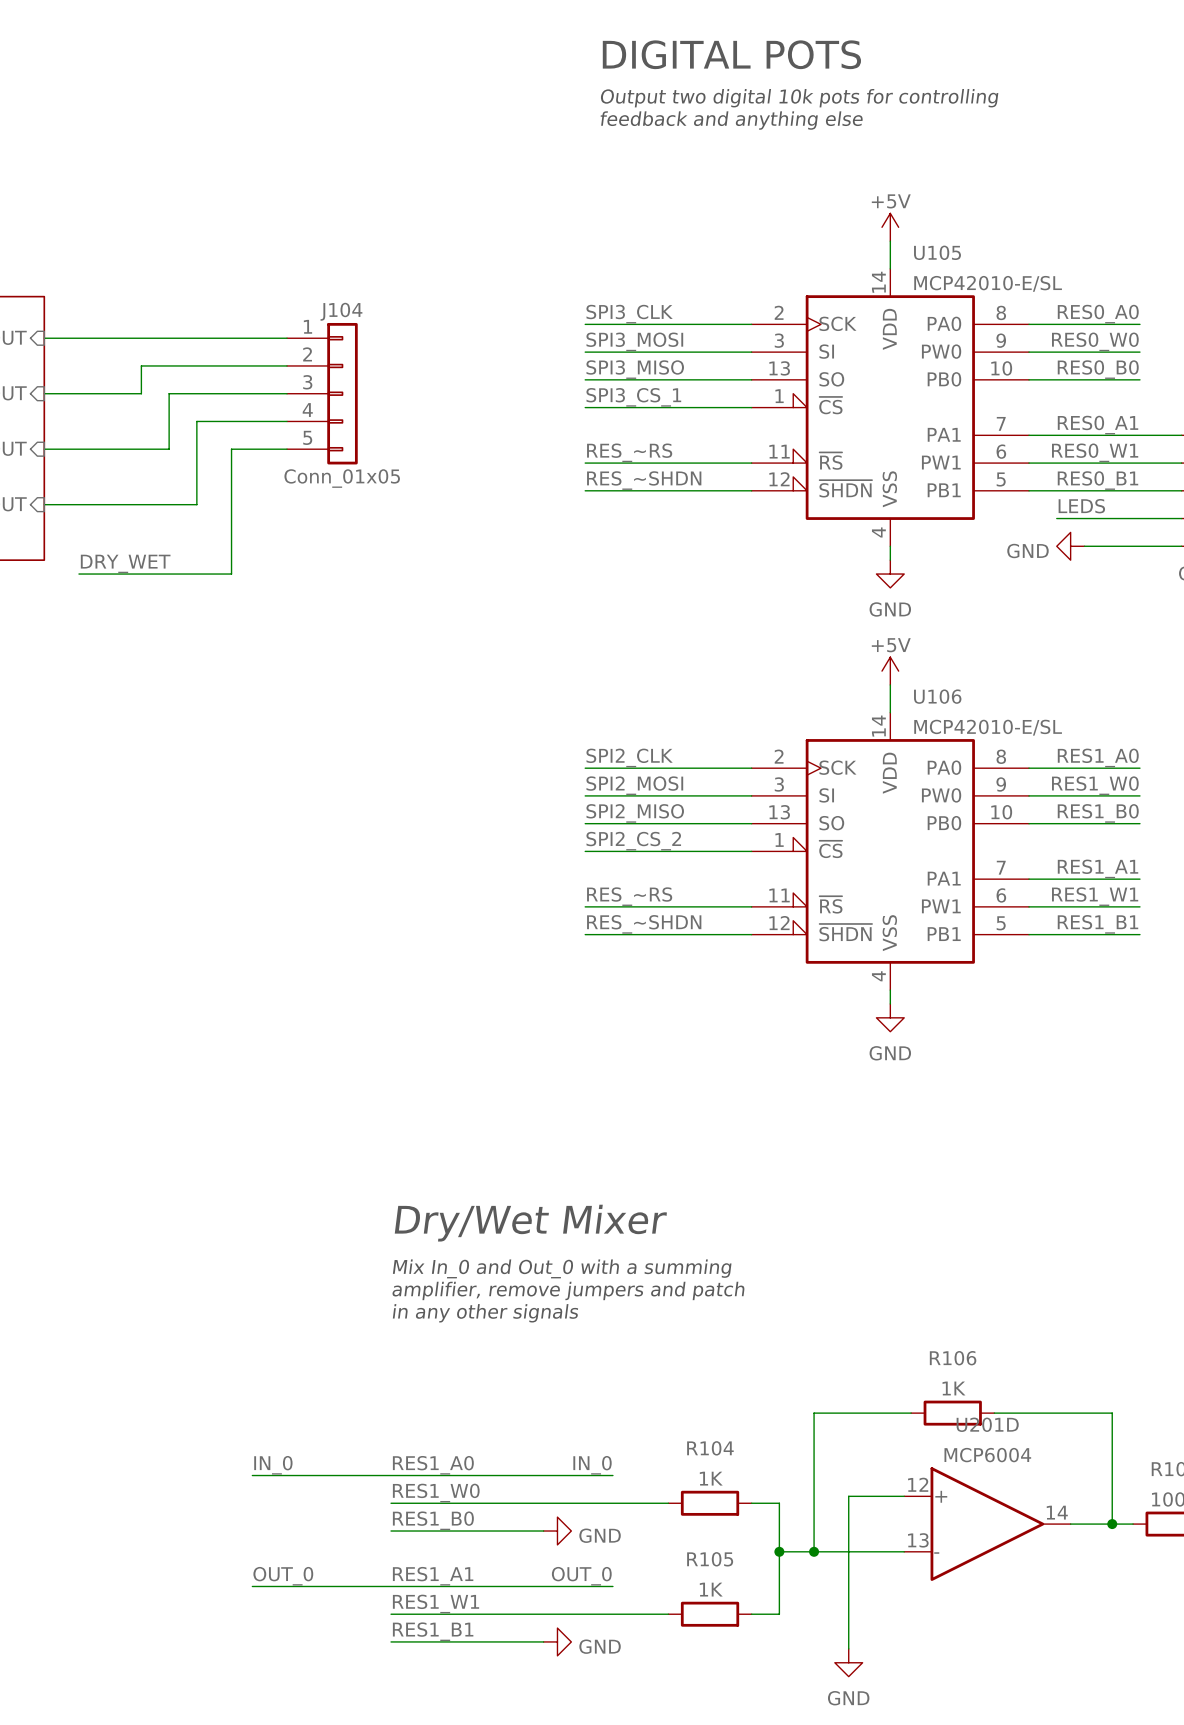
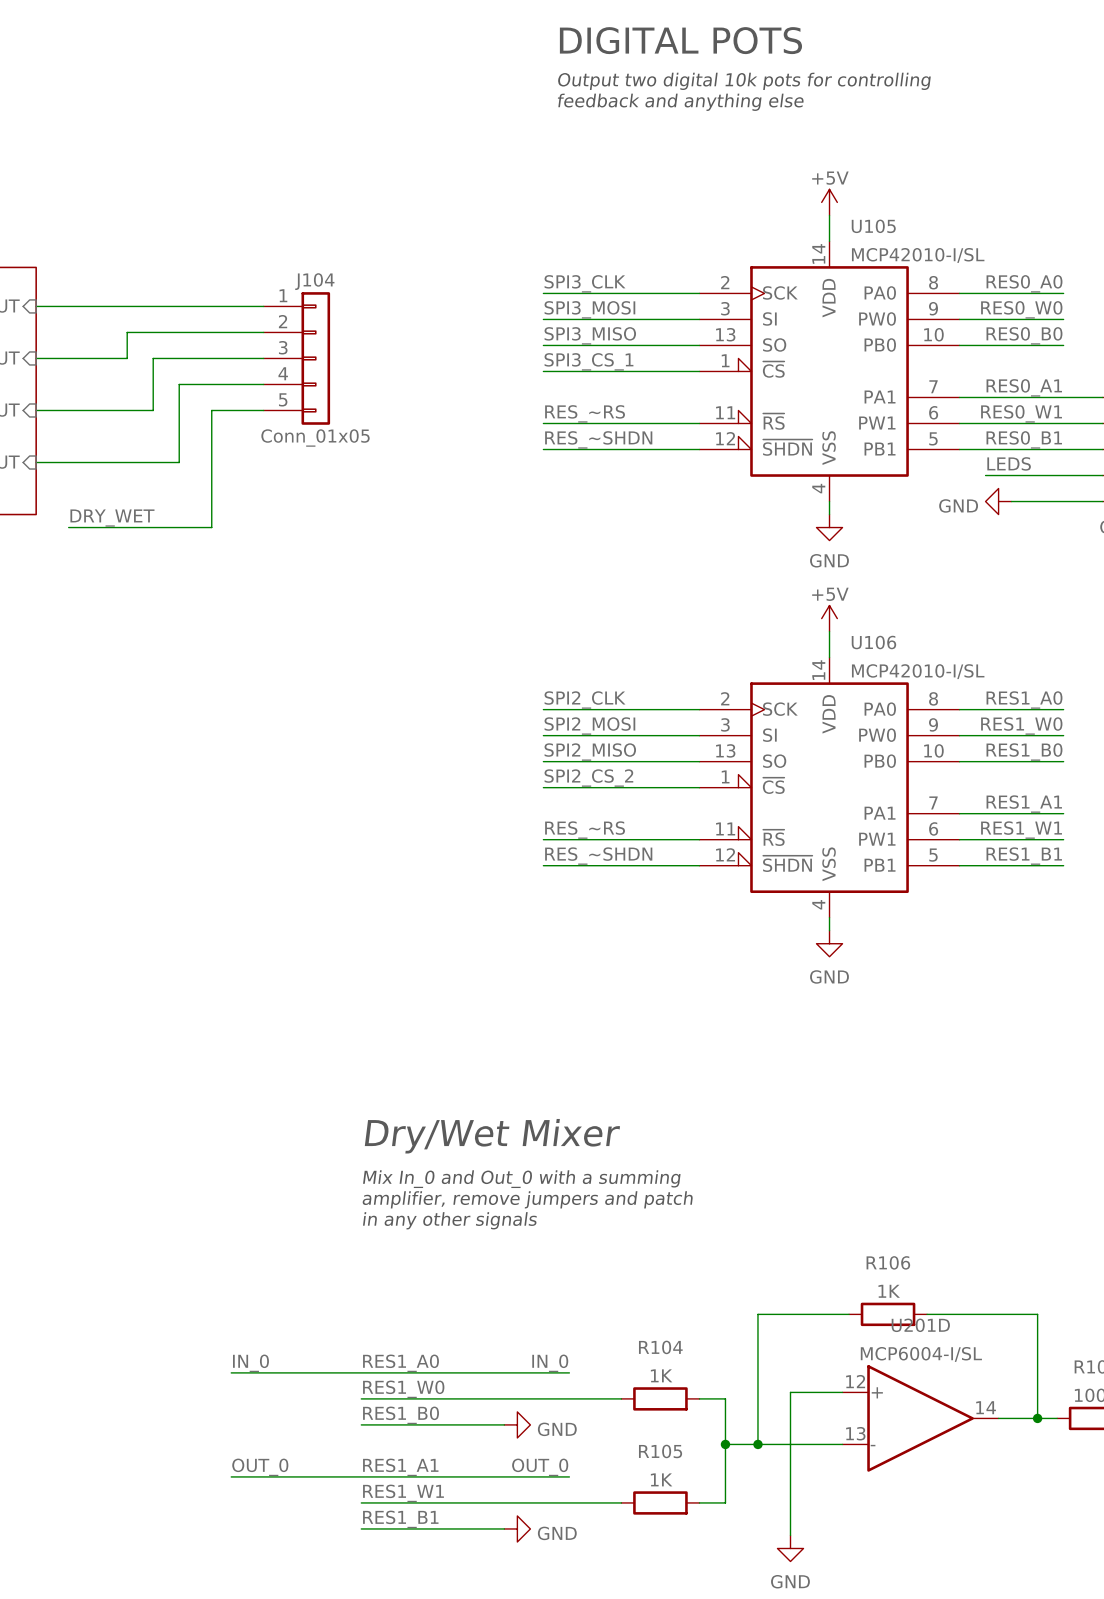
U105 value: MCP42010-E/SL (988, 283) -> MCP42010-I/SL (918, 255)
U106 value: MCP42010-E/SL (988, 727) -> MCP42010-I/SL (918, 671)
U201D value: MCP6004 (987, 1455) -> MCP6004-I/SL (921, 1354)

